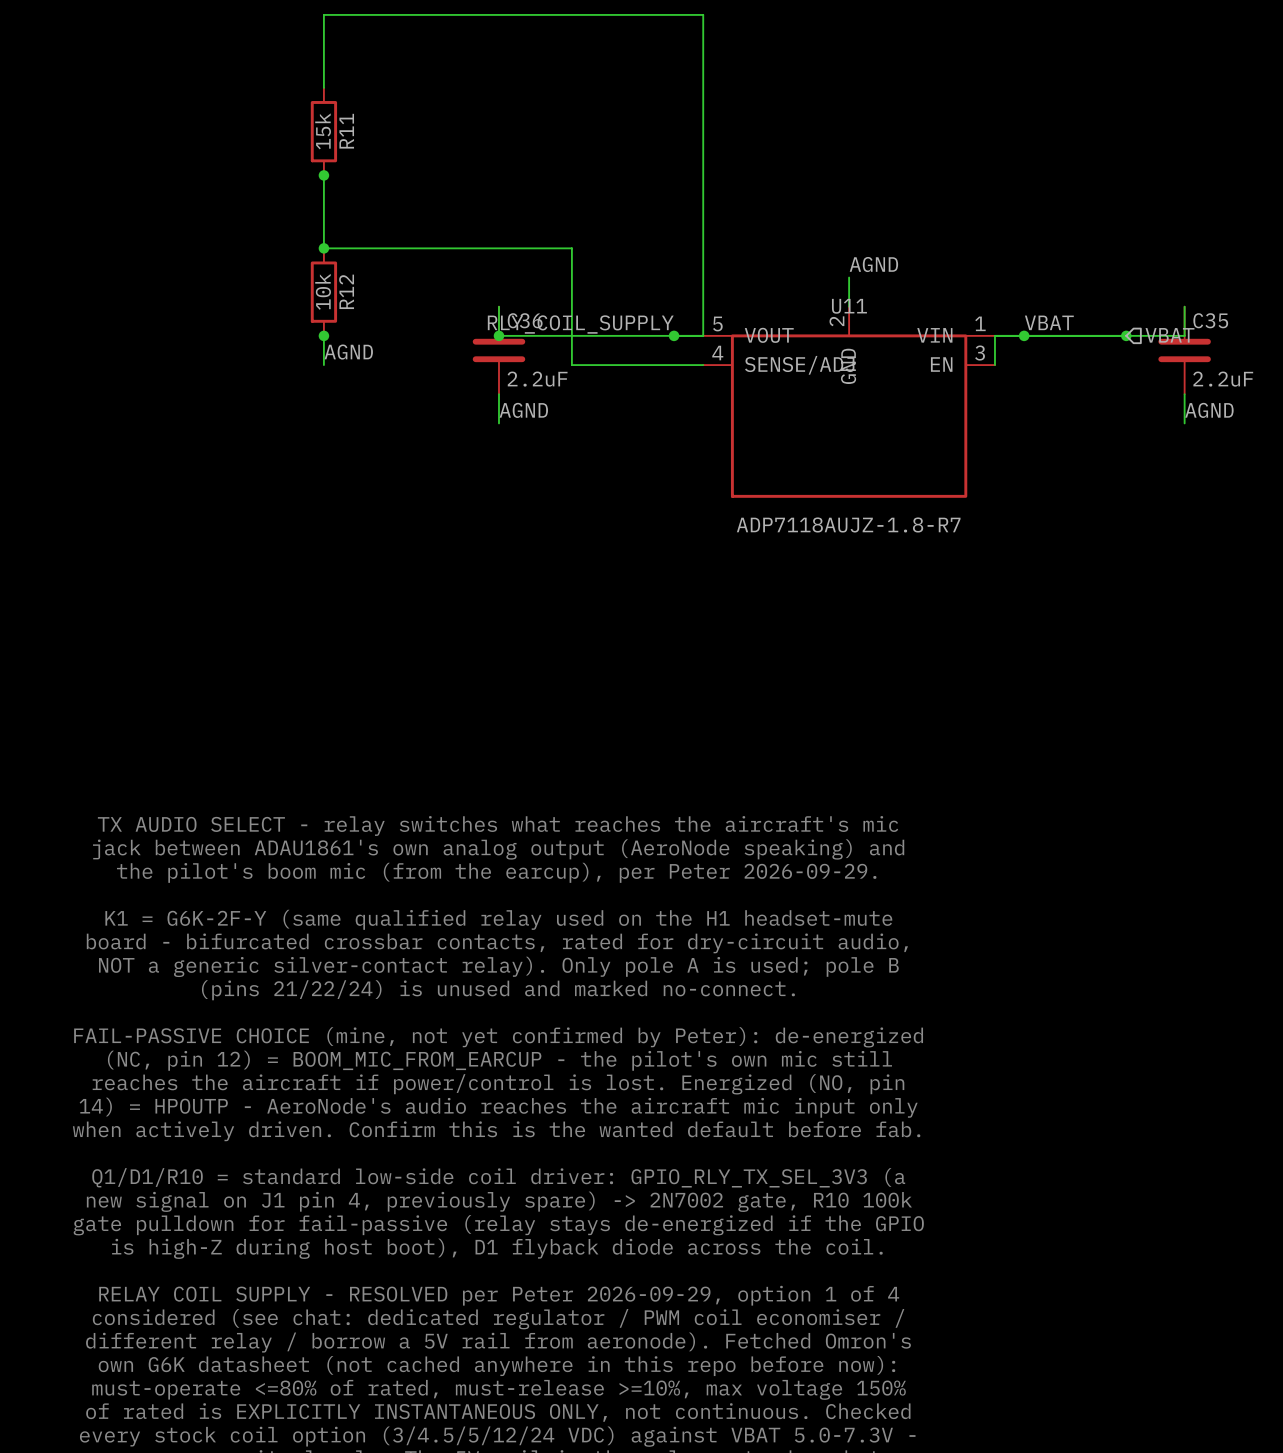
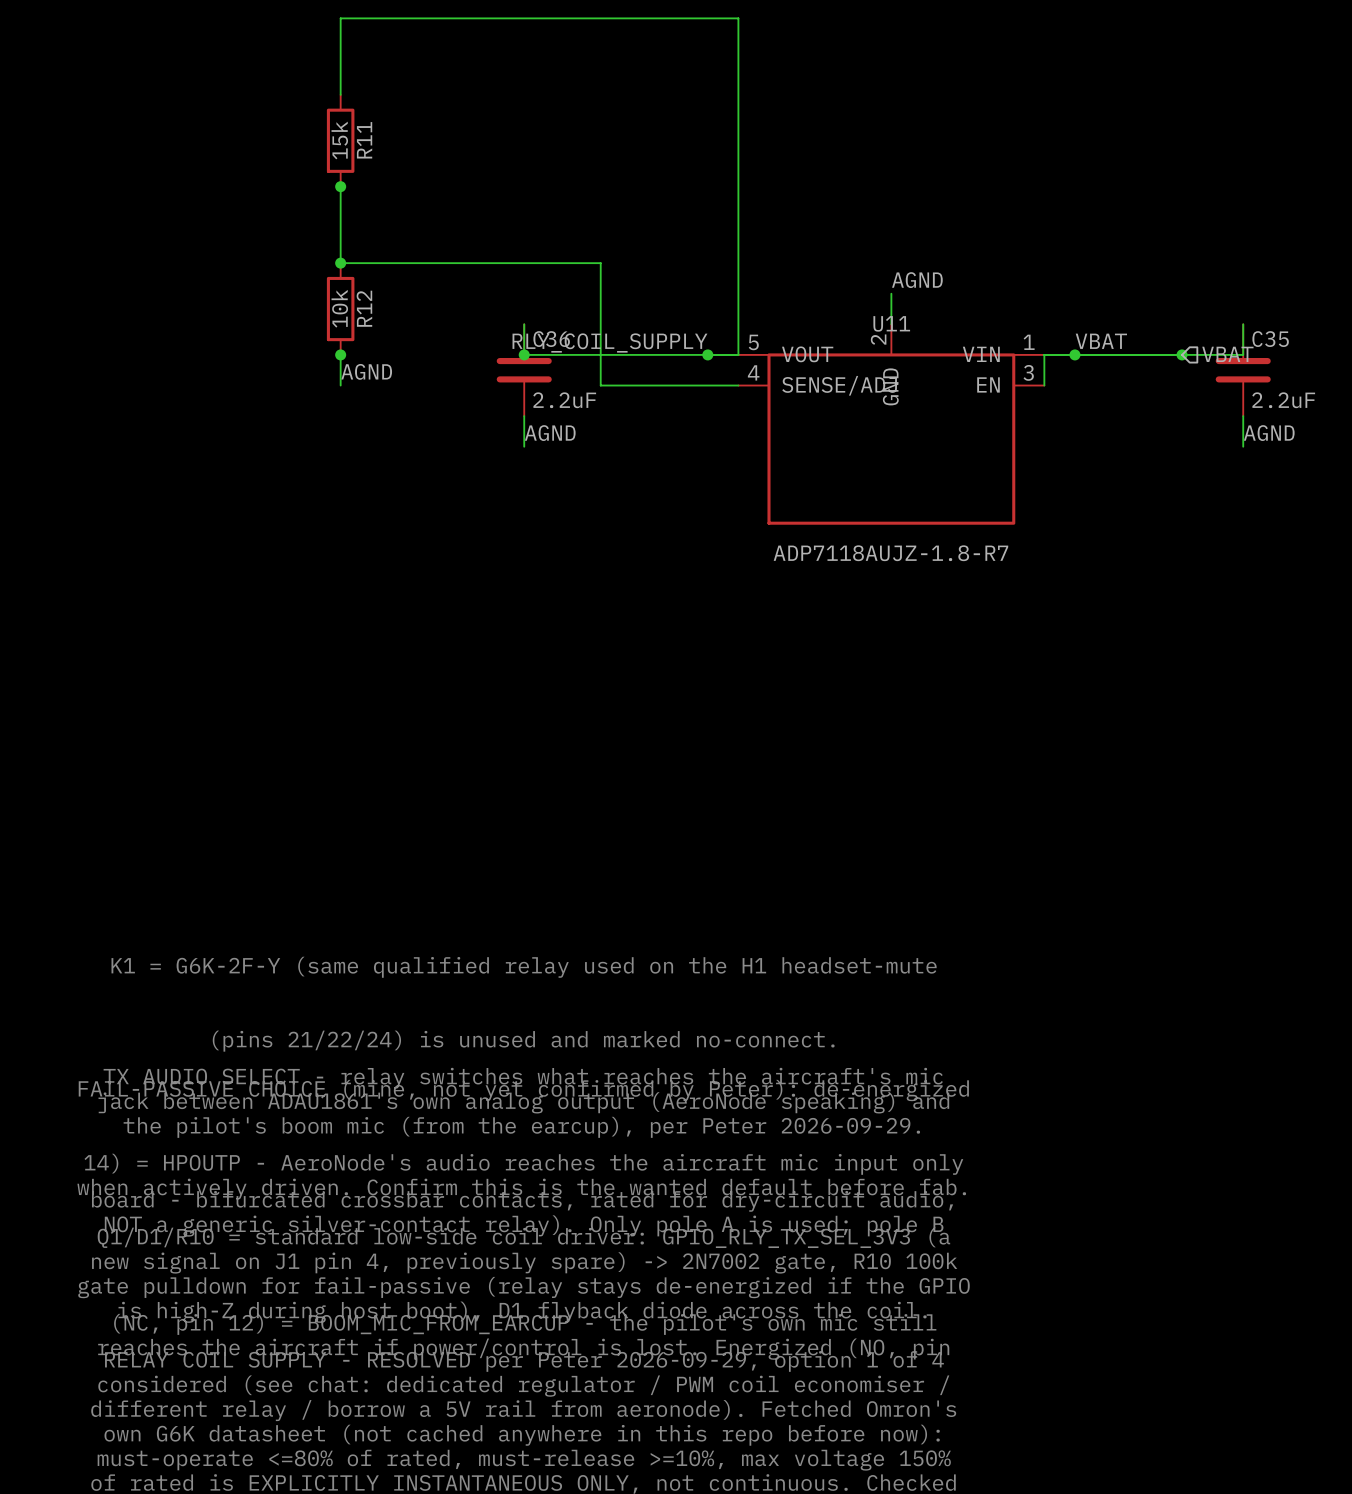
text position: TX AUDIO SELECT - relay switches what reaches the aircraft's mic (498, 825) -> TX AUDIO SELECT - relay switches what reaches the aircraft's mic (523, 1078)
text position: jack between ADAU1861's own analog output (AeroNode speaking) and (498, 849) -> jack between ADAU1861's own analog output (AeroNode speaking) and (523, 1102)
text position: the pilot's boom mic (from the earcup), per Peter 2026-09-29. (496, 872) -> the pilot's boom mic (from the earcup), per Peter 2026-09-29. (521, 1127)
text position: board - bifurcated crossbar contacts, rated for dry-circuit audio, (497, 943) -> board - bifurcated crossbar contacts, rated for dry-circuit audio, (522, 1201)
text position: NOT a generic silver-contact relay). Only pole A is used; pole B (498, 966) -> NOT a generic silver-contact relay). Only pole A is used; pole B (524, 1225)
text position: (NC, pin 12) = BOOM_MIC_FROM_EARCUP - the pilot's own mic still (499, 1060) -> (NC, pin 12) = BOOM_MIC_FROM_EARCUP - the pilot's own mic still (525, 1324)
text position: reaches the aircraft if power/control is lost. Energized (NO, pin (498, 1084) -> reaches the aircraft if power/control is lost. Energized (NO, pin (523, 1349)

